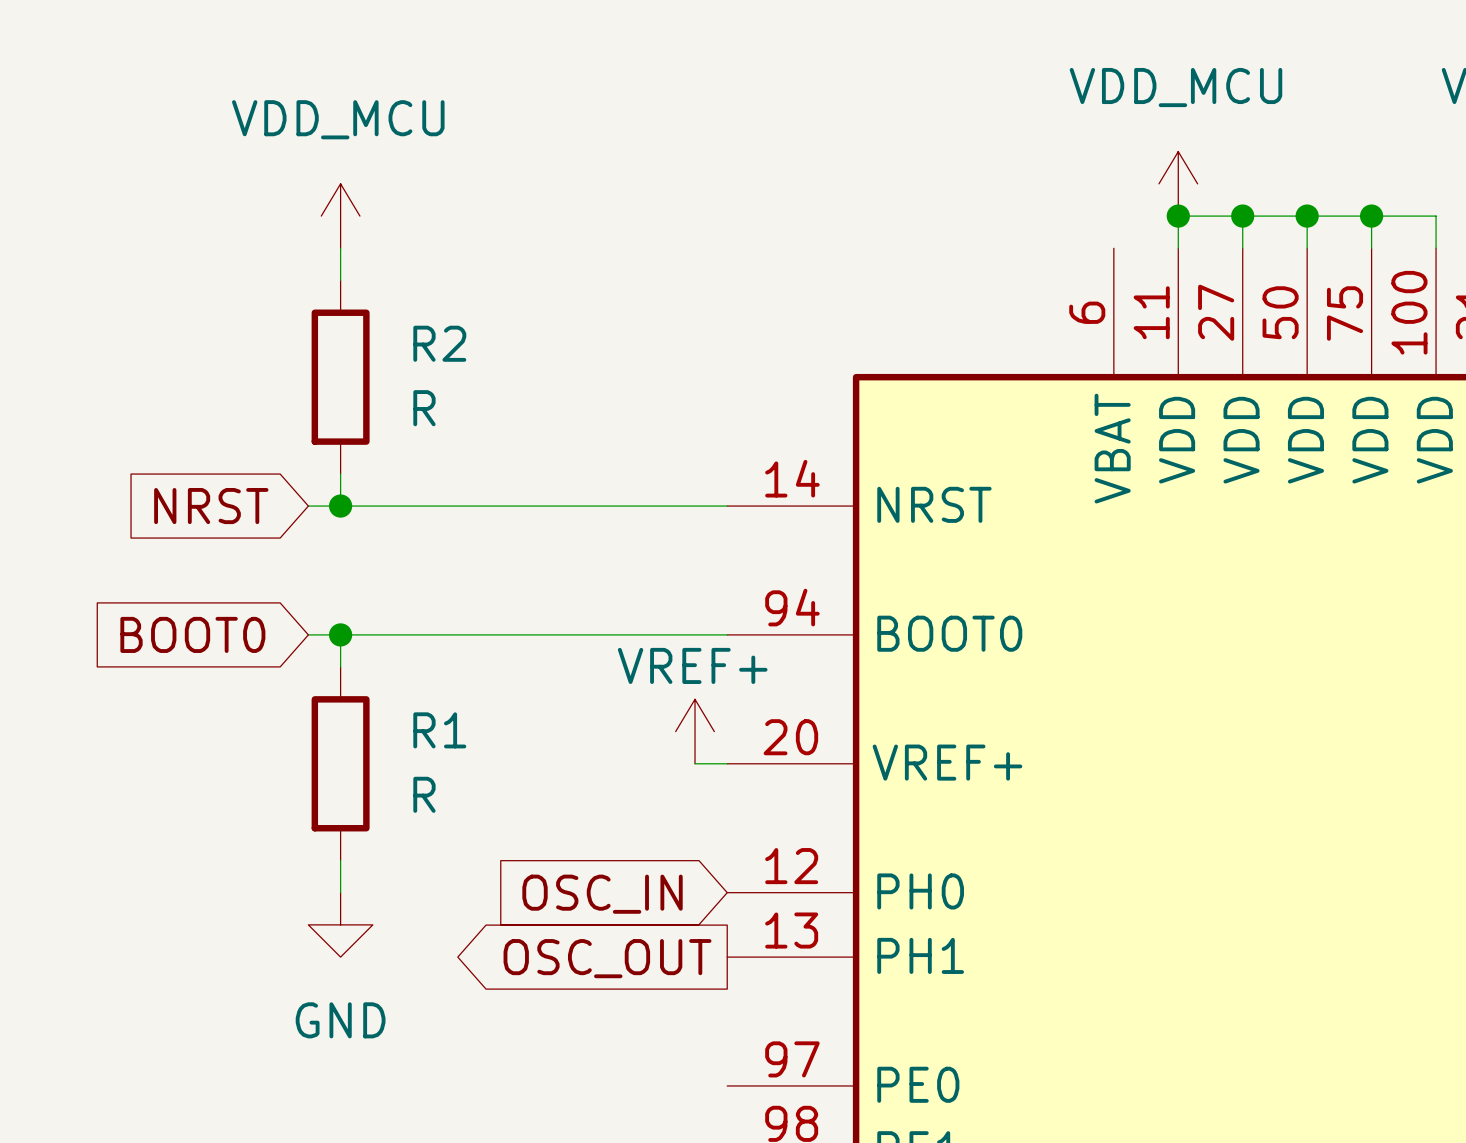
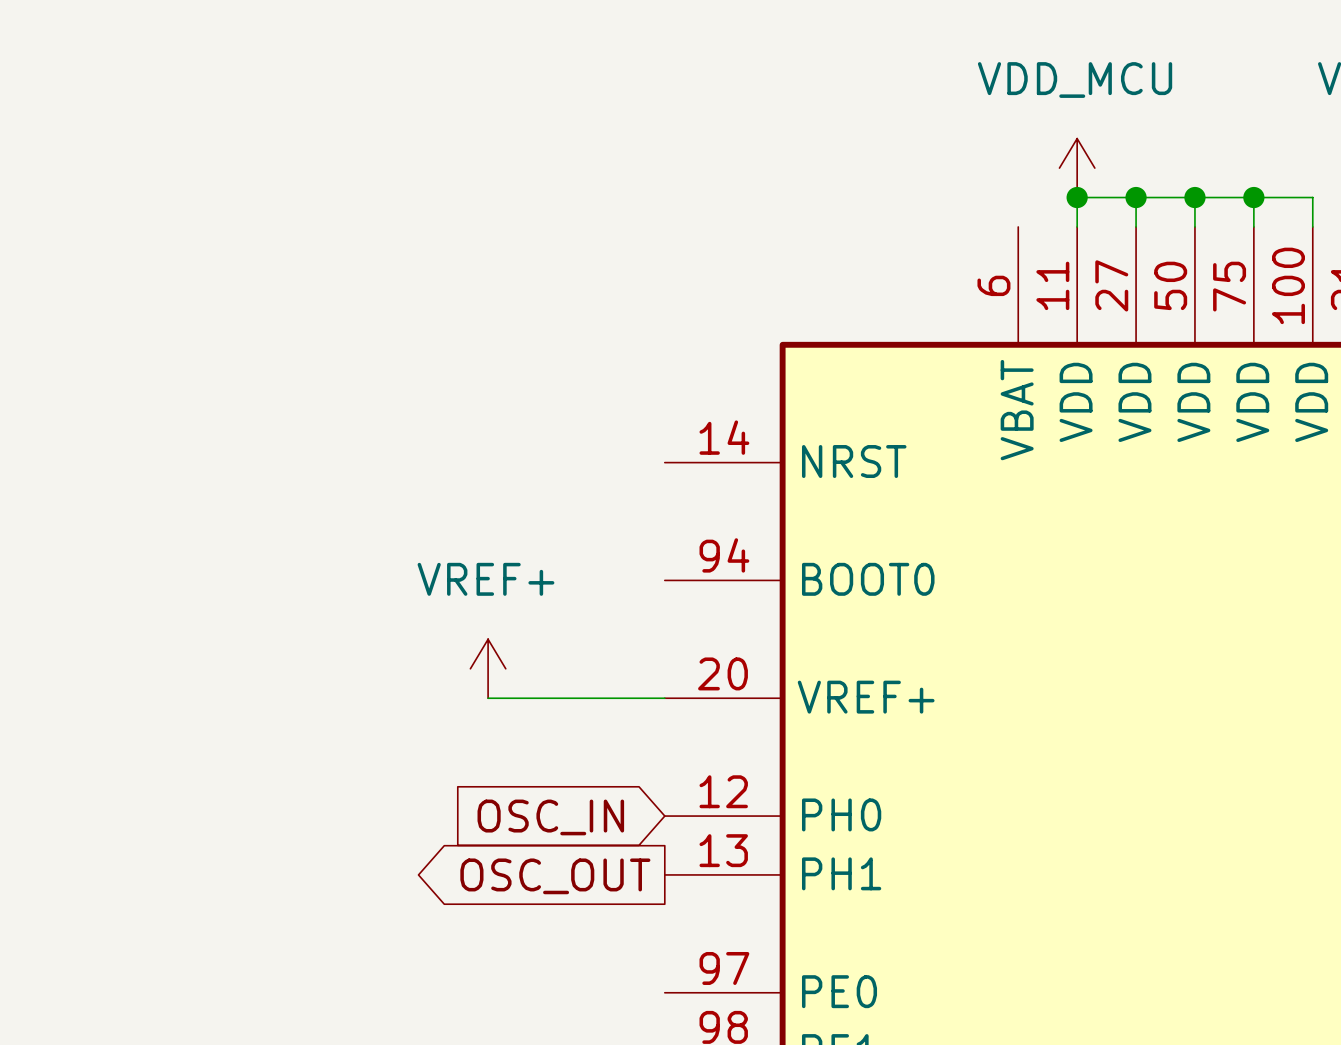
power symbol: VDD_MCU (340, 216) -> none
wire: (340, 248) (340, 280) -> none
R2: R (340, 377) -> none
wire: (340, 473) (340, 506) -> none
global label: NRST (211, 506) -> none
wire: (308, 506) (727, 506) -> none
junction: (340, 506) -> none
global label: BOOT0 (192, 634) -> none
wire: (308, 634) (727, 634) -> none
wire: (340, 634) (340, 667) -> none
junction: (340, 634) -> none
power symbol text position: VREF+ (692, 665) -> VREF+ (485, 579)
power symbol position: VREF+ (695, 731) -> VREF+ (488, 668)
R1: R (340, 763) -> none
wire: none -> (488, 698) (635, 698)
wire: (340, 860) (340, 892) -> none
power symbol: GND (340, 924) -> none

